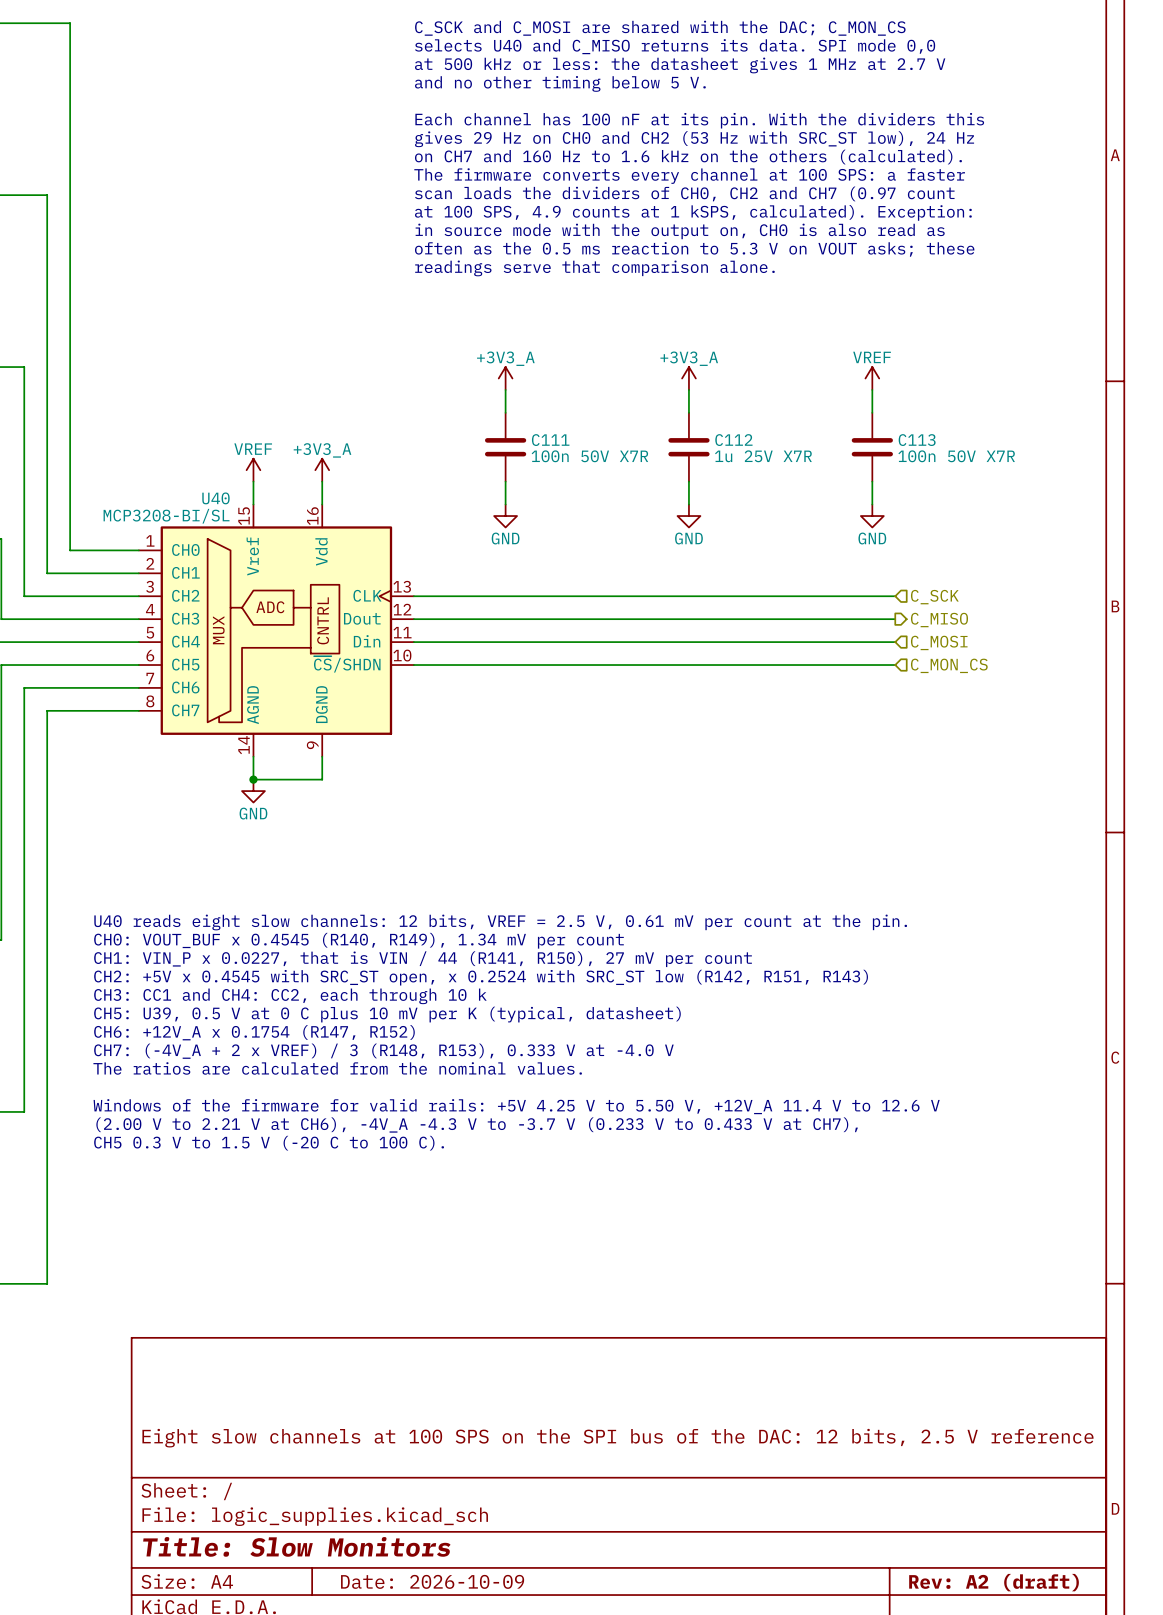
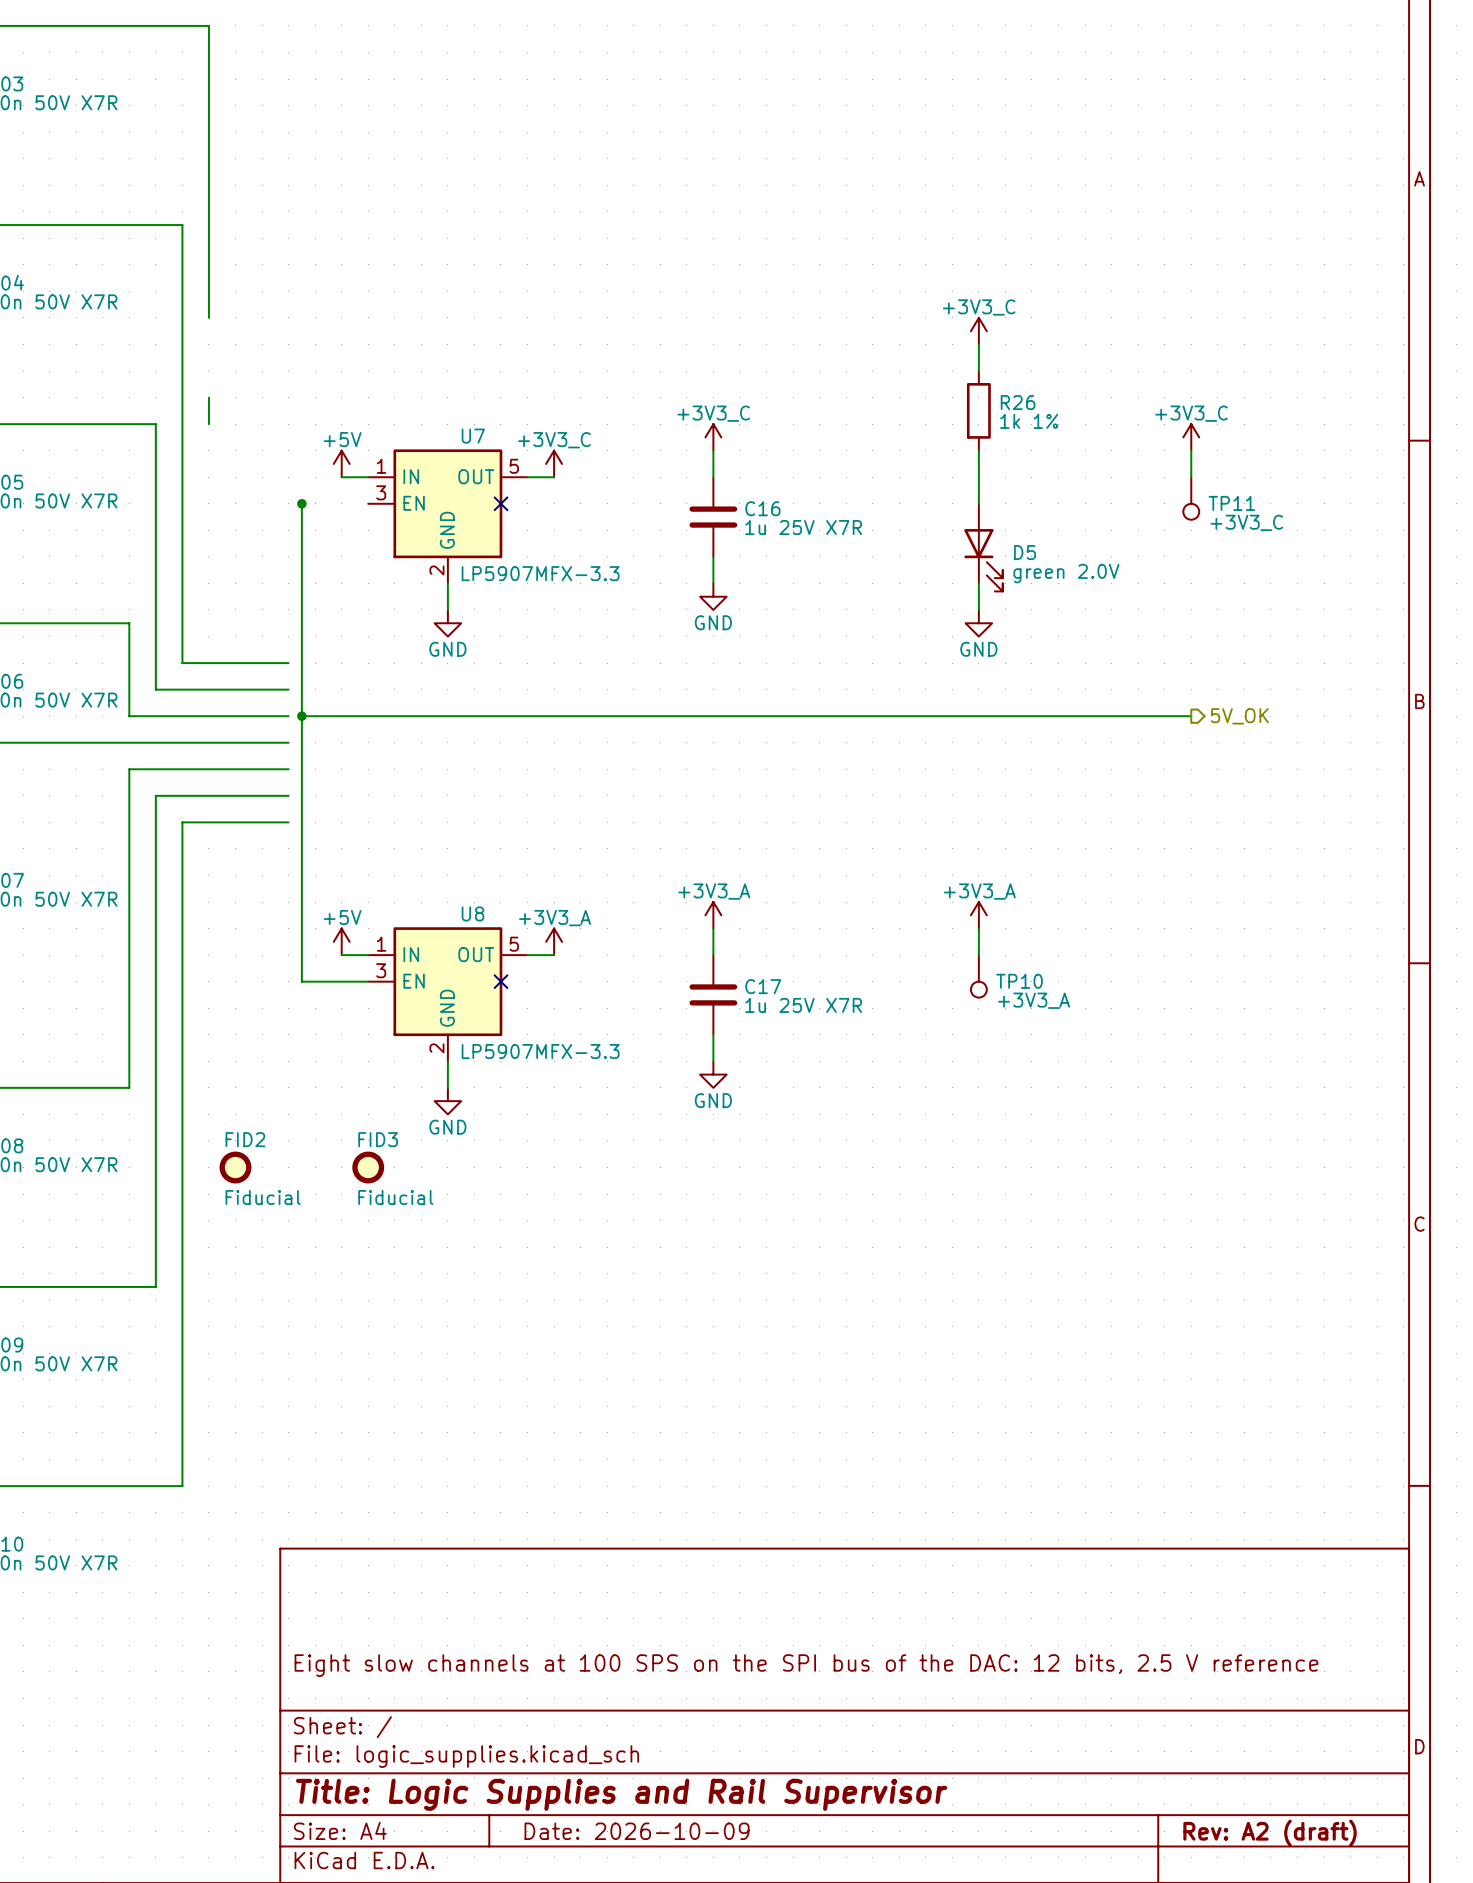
text: C_SCK and C_MOSI are shared with the DAC; C_MON_CS (660, 28) -> none
text: selects U40 and C_MISO returns its data. SPI mode 0,0 (675, 46) -> none
text: at 500 kHz or less: the datasheet gives 1 MHz at 2.7 V (680, 65) -> none
text: and no other timing below 5 V. (560, 83) -> none
text: Each channel has 100 nF at its pin. With the dividers this (699, 120) -> none
text: gives 29 Hz on CH0 and CH2 (53 Hz with SRC_ST low), 24 Hz (694, 139) -> none
text: on CH7 and 160 Hz to 1.6 kHz on the others (calculated). (688, 157) -> none
text: The firmware converts every channel at 100 SPS: a faster (689, 176) -> none
text: scan loads the dividers of CH0, CH2 and CH7 (0.97 count (684, 193) -> none
text: at 100 SPS, 4.9 counts at 1 kSPS, calculated). Exception: (693, 212) -> none
text: in source mode with the output on, CH0 is also read as (680, 231) -> none
text: often as the 0.5 ms reaction to 5.3 V on VOUT asks; these (694, 249) -> none
text: readings serve that comparison alone. (594, 268) -> none
wire: (70, 275) (70, 344) -> none
power symbol: none -> +3V3_C (978, 331)
R26: none -> 1k 1% (978, 410)
wire: (70, 367) (70, 550) (138, 550) -> none
power symbol: +3V3_A (505, 378) -> +3V3_C (713, 437)
power symbol: +3V3_A (688, 378) -> none
power symbol: VREF (872, 378) -> none
power symbol: none -> +3V3_C (1191, 437)
wire: (688, 389) (688, 412) -> (978, 344) (978, 371)
wire: none -> (978, 450) (978, 503)
wire: (872, 389) (872, 412) -> none
power symbol: none -> +5V (341, 463)
power symbol: none -> +3V3_C (554, 463)
wire: none -> (341, 477) (368, 477)
wire: none -> (527, 477) (554, 477)
TP11: none -> +3V3_C (1191, 498)
wire: none -> (301, 503) (301, 981) (368, 981)
junction: none -> (301, 503)
no-connect mark: none -> (500, 503)
C111 name: C111 (550, 440) -> C16 (762, 508)
U7: none -> LP5907MFX-3.3 (447, 516)
C112: 1u 25V X7R (688, 447) -> none
C113: 100n 50V X7R (872, 447) -> none
C111 value: 100n 50V X7R (589, 456) -> 1u 25V X7R (803, 527)
power symbol: VREF (253, 470) -> none
power symbol: +3V3_A (322, 470) -> none
D5: none -> green 2.0V (983, 547)
wire: (253, 481) (253, 504) -> (447, 583) (447, 609)
wire: (322, 481) (322, 504) -> none
wire: (688, 481) (688, 504) -> (978, 583) (978, 609)
wire: (872, 481) (872, 504) -> (1191, 450) (1191, 477)
power symbol position: GND (688, 516) -> GND (978, 623)
power symbol: GND (872, 516) -> none
power symbol: none -> GND (447, 623)
wire: (413, 596) (895, 596) -> none
hierarchical label: C_SCK (934, 597) -> none
junction: none -> (301, 716)
wire: none -> (1164, 716) (1191, 716)
hierarchical label: C_MISO (939, 620) -> none
hierarchical label: none -> 5V_OK (1239, 716)
U40: MCP3208-BI/SL (276, 630) -> none
wire: (413, 642) (895, 642) -> none
hierarchical label: C_MOSI (939, 642) -> none
wire: (413, 665) (895, 665) -> none
hierarchical label: C_MON_CS (949, 665) -> none
wire: (253, 756) (253, 779) (322, 779) (322, 756) -> none
junction: (253, 779) -> none
power symbol: GND (253, 791) -> none
power symbol: none -> +3V3_A (713, 915)
power symbol: none -> +3V3_A (978, 915)
wire: none -> (713, 928) (713, 955)
wire: none -> (978, 928) (978, 955)
power symbol: none -> +5V (341, 941)
power symbol: none -> +3V3_A (554, 941)
wire: none -> (341, 955) (368, 955)
wire: none -> (527, 955) (554, 955)
TP10: none -> +3V3_A (978, 976)
no-connect mark: none -> (500, 981)
U8: none -> LP5907MFX-3.3 (447, 994)
C17: none -> 1u 25V X7R (713, 994)
wire: none -> (713, 1034) (713, 1061)
wire: none -> (447, 1061) (447, 1087)
text: U40 reads eight slow channels: 12 bits, VREF = 2.5 V, 0.61 mV per count at the pin. (500, 922) -> none
power symbol: none -> GND (713, 1074)
text: CH0: VOUT_BUF x 0.4545 (R140, R149), 1.34 mV per count (358, 940) -> none
power symbol: none -> GND (447, 1101)
text: CH1: VIN_P x 0.0227, that is VIN / 44 (R141, R150), 27 mV per count (423, 959) -> none
text: CH2: +5V x 0.4545 with SRC_ST open, x 0.2524 with SRC_ST low (R142, R151, R143) (481, 977) -> none
text: CH3: CC1 and CH4: CC2, each through 10 k (290, 996) -> none
FID2: none -> Fiducial (235, 1167)
FID3: none -> Fiducial (368, 1167)
text: CH5: U39, 0.5 V at 0 C plus 10 mV per K (typical, datasheet) (387, 1014) -> none
text: CH6: +12V_A x 0.1754 (R147, R152) (254, 1032) -> none
text: CH7: (-4V_A + 2 x VREF) / 3 (R148, R153), 0.333 V at -4.0 V (383, 1051) -> none
text: The ratios are calculated from the nominal values. (337, 1068) -> none
text: Windows of the firmware for valid rails: +5V 4.25 V to 5.50 V, +12V_A 11.4 V to 12.6 V (516, 1106) -> none
text: (2.00 V to 2.21 V at CH6), -4V_A -4.3 V to -3.7 V (0.233 V to 0.433 V at CH7), (477, 1125) -> none
text: CH5 0.3 V to 1.5 V (-20 C to 100 C). (269, 1143) -> none
title block: Title: Slow Monitors (296, 1546) -> Title: Logic Supplies and Rail Supervisor (621, 1794)

